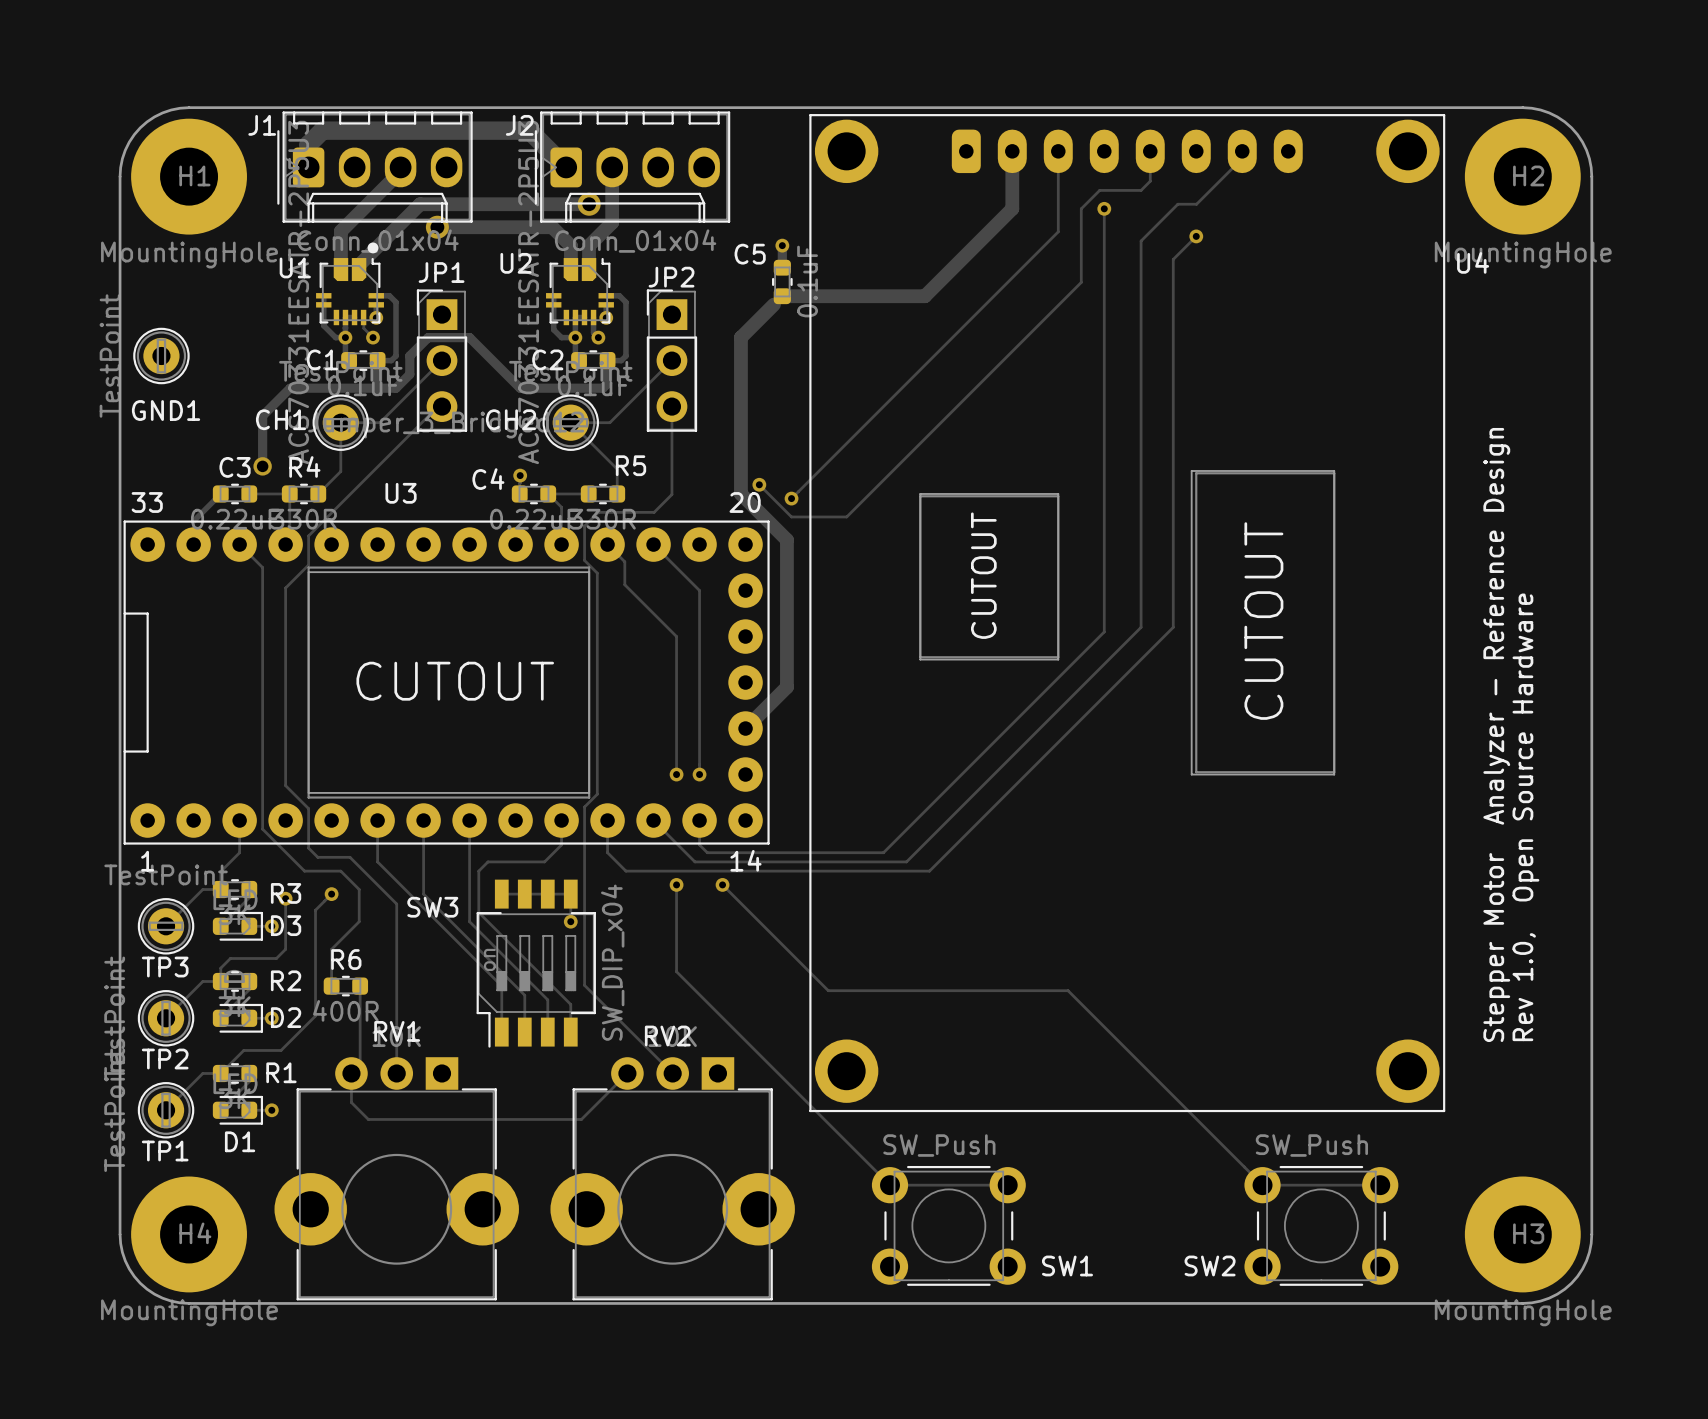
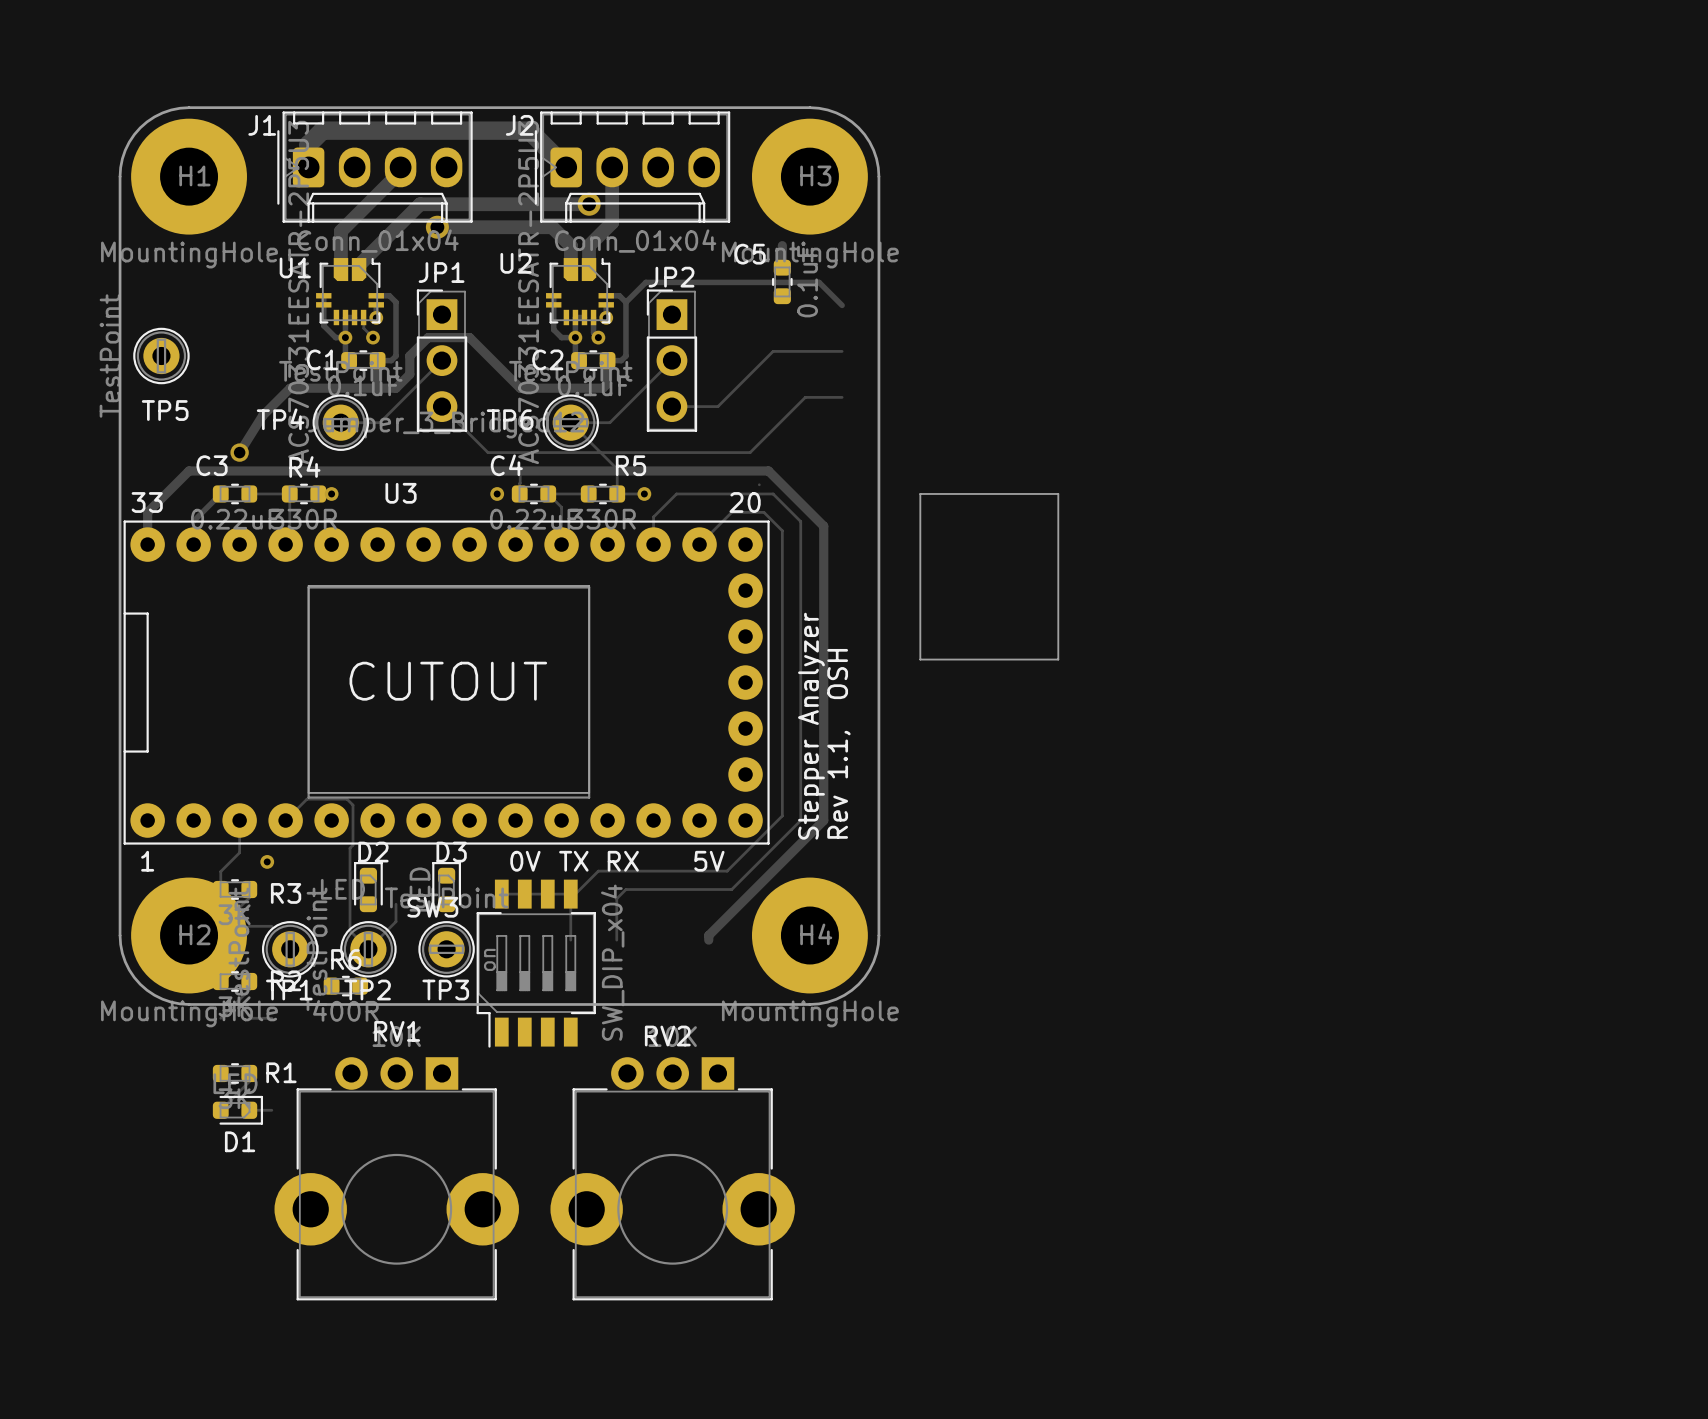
board edge: (809, 107) (1522, 107) (1540, 110) (1557, 116) (1571, 127) (1582, 142) (1589, 158) (1591, 176) (1591, 1234) (1589, 1252) (1577, 1276) (1564, 1289) (1549, 1298) (1522, 1303) (189, 1303) (171, 1301) (154, 1294) (134, 1276) (125, 1260) (120, 1243) (120, 935) -> (809, 107) (836, 112) (858, 127) (873, 150) (878, 176) (878, 935) (876, 953) (864, 977) (844, 995) (827, 1002) (809, 1004) (189, 1004) (162, 999) (140, 984) (125, 961) (120, 935)
track: (1012, 151) (1012, 208) (924, 296) (782, 296) (740, 337) (740, 493) (786, 539) (786, 687) (745, 728) -> none
track: (1058, 151) (1058, 231) (791, 498) -> none
track: (1150, 151) (1150, 181) (1141, 190) (1099, 190) (1081, 208) (1081, 282) (846, 516) (791, 516) (759, 484) -> none
track: (1242, 151) (1242, 158) (1196, 204) (1177, 204) (1141, 241) (1141, 627) (906, 861) (694, 861) (653, 820) -> none
H2 position: (1522, 176) -> (189, 935)
track: (1104, 208) (1104, 631) (883, 852) (707, 852) (699, 844) (699, 820) -> none
via: (1104, 208) -> none
track: (1196, 236) (1173, 259) (1173, 627) (929, 871) (727, 871) -> (699, 544) (731, 512) (763, 512) (782, 530) (782, 815) (727, 871)
via: (1196, 236) -> none
U1 footprint: [316, 242, 384, 326] -> [316, 257, 384, 326]
via: (782, 245) -> none
track: none -> (625, 302) (645, 282) (819, 282) (842, 305)
track: (442, 406) (437, 406) (308, 535) (308, 565) (285, 588) (285, 785) (308, 808) (308, 848) (317, 857) (350, 857) (396, 904) (396, 1073) -> (442, 406) (487, 452) (750, 452) (805, 397) (842, 397)
track: (671, 406) (671, 494) (654, 512) (598, 512) (584, 526) (584, 560) (597, 573) (597, 794) (584, 807) (584, 985) (672, 1073) -> (671, 406) (717, 406) (773, 351) (842, 351)
GND1 name: GND1 (166, 410) -> TP5 (165, 410)
track: (262, 415) (262, 466) -> (262, 415) (239, 452)
CH1 name: CH1 (281, 419) -> TP4 (280, 419)
CH2 name: CH2 (510, 419) -> TP6 (510, 419)
track: (340, 422) (340, 471) (318, 493) -> none
via position: (262, 466) -> (239, 452)
C3 name position: C3 (235, 467) -> C3 (212, 465)
board edge: (1191, 470) (1191, 774) (1334, 774) (1334, 470) (1191, 470) -> none
via position: (520, 475) -> (497, 493)
C4 name position: C4 (488, 479) -> C4 (506, 465)
via: (759, 484) -> none
via: none -> (331, 493)
track: none -> (621, 493) (644, 493)
via: none -> (644, 493)
via: (791, 498) -> none
U3 footprint: [123, 520, 770, 845] -> [123, 520, 770, 845]
track: none -> (147, 544) (147, 512) (189, 470) (768, 470) (823, 526) (823, 820) (708, 935) (708, 940)
track: (239, 544) (262, 567) (262, 829) (304, 871) (340, 871) (359, 889) (359, 921) (331, 949) (331, 986) -> none
track: (607, 544) (624, 561) (624, 584) (676, 636) (676, 774) -> none
track: (653, 544) (699, 590) (699, 774) -> (653, 544) (653, 516) (676, 493) (773, 493) (800, 521) (800, 820) (731, 889) (625, 889) (616, 898) (616, 940)
text: CUTOUT (983, 575) -> none
board edge: (308, 585) (308, 572) (589, 572) (589, 585) -> (308, 585) (589, 585)
U4: (1127, 613) -> none
text: none -> Stepper Analyzer (811, 726)
text: Stepper Motor Analyzer - Reference Design (1496, 734) -> none
text: none -> Rev 1.1, OSH (838, 743)
via: (676, 774) -> none
via: (699, 774) -> none
text: Rev 1.0, Open Source Hardware (1525, 817) -> none
track: none -> (285, 820) (307, 799) (347, 799) (353, 805) (353, 845) (350, 848) (350, 930) (368, 949) (396, 921) (396, 904)
track: (377, 820) (377, 861) (501, 986) (501, 1032) -> none
track: (423, 820) (423, 894) (524, 995) (524, 1032) -> none
track: (469, 820) (469, 921) (547, 999) (547, 1032) -> none
track: (561, 820) (561, 844) (544, 861) (487, 861) (478, 871) (478, 912) (570, 1004) (570, 1032) -> none
track: (607, 820) (607, 852) (625, 871) -> (570, 898) (598, 871) (625, 871)
text: 14 (745, 860) -> none
via: none -> (267, 861)
text: none -> 0V (525, 861)
text: none -> TX (573, 861)
text: none -> RX (623, 861)
text: none -> 5V (709, 861)
track: (676, 884) (676, 971) (890, 1185) (1007, 1185) -> none
via: (676, 884) -> none
track: (722, 884) (828, 990) (1068, 990) (1262, 1185) (1380, 1185) -> none
via: (722, 884) -> none
track: (331, 894) (315, 910) (315, 1015) (281, 1050) (243, 1050) (220, 1073) (202, 1073) (166, 1110) -> none
via: (331, 894) -> none
track: (285, 898) (285, 949) (276, 958) (230, 958) (220, 968) (220, 981) (202, 981) (166, 1018) -> none
via: (285, 898) -> none
track: none -> (570, 921) (570, 940)
via: (570, 921) -> none
TP3 position: (166, 926) -> (446, 949)
D3 rotation: 0° (237, 926) -> 90° counterclockwise (446, 887)
D3 position: (237, 926) -> (446, 887)
via: (271, 926) -> none
track: (360, 986) (360, 1064) (351, 1073) (351, 1102) (368, 1119) (581, 1119) (627, 1073) -> none
TP2 position: (166, 1018) -> (368, 949)
D2 rotation: 0° (237, 1018) -> 90° counterclockwise (368, 887)
D2 position: (237, 1018) -> (368, 887)
via: (271, 1018) -> none
TP1 position: (166, 1110) -> (290, 949)
via: (271, 1110) -> none
SW1: SW_Push (948, 1225) -> none
SW2: SW_Push (1321, 1225) -> none
H4 position: (189, 1234) -> (809, 935)
H3 position: (1522, 1234) -> (809, 176)

